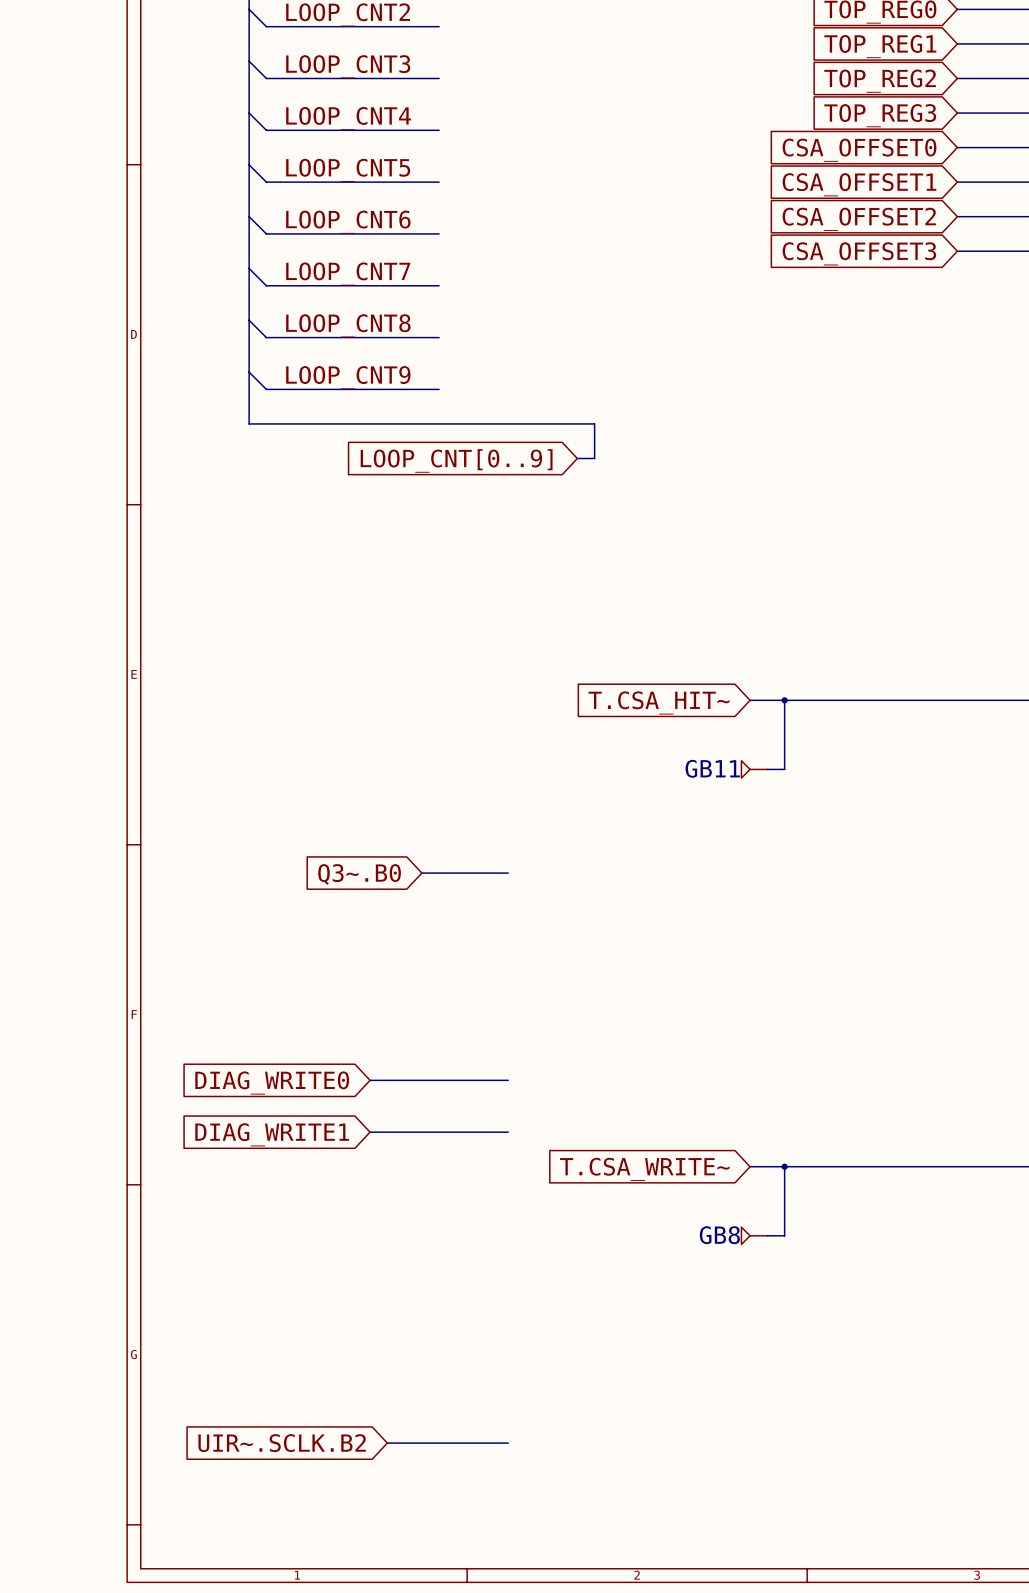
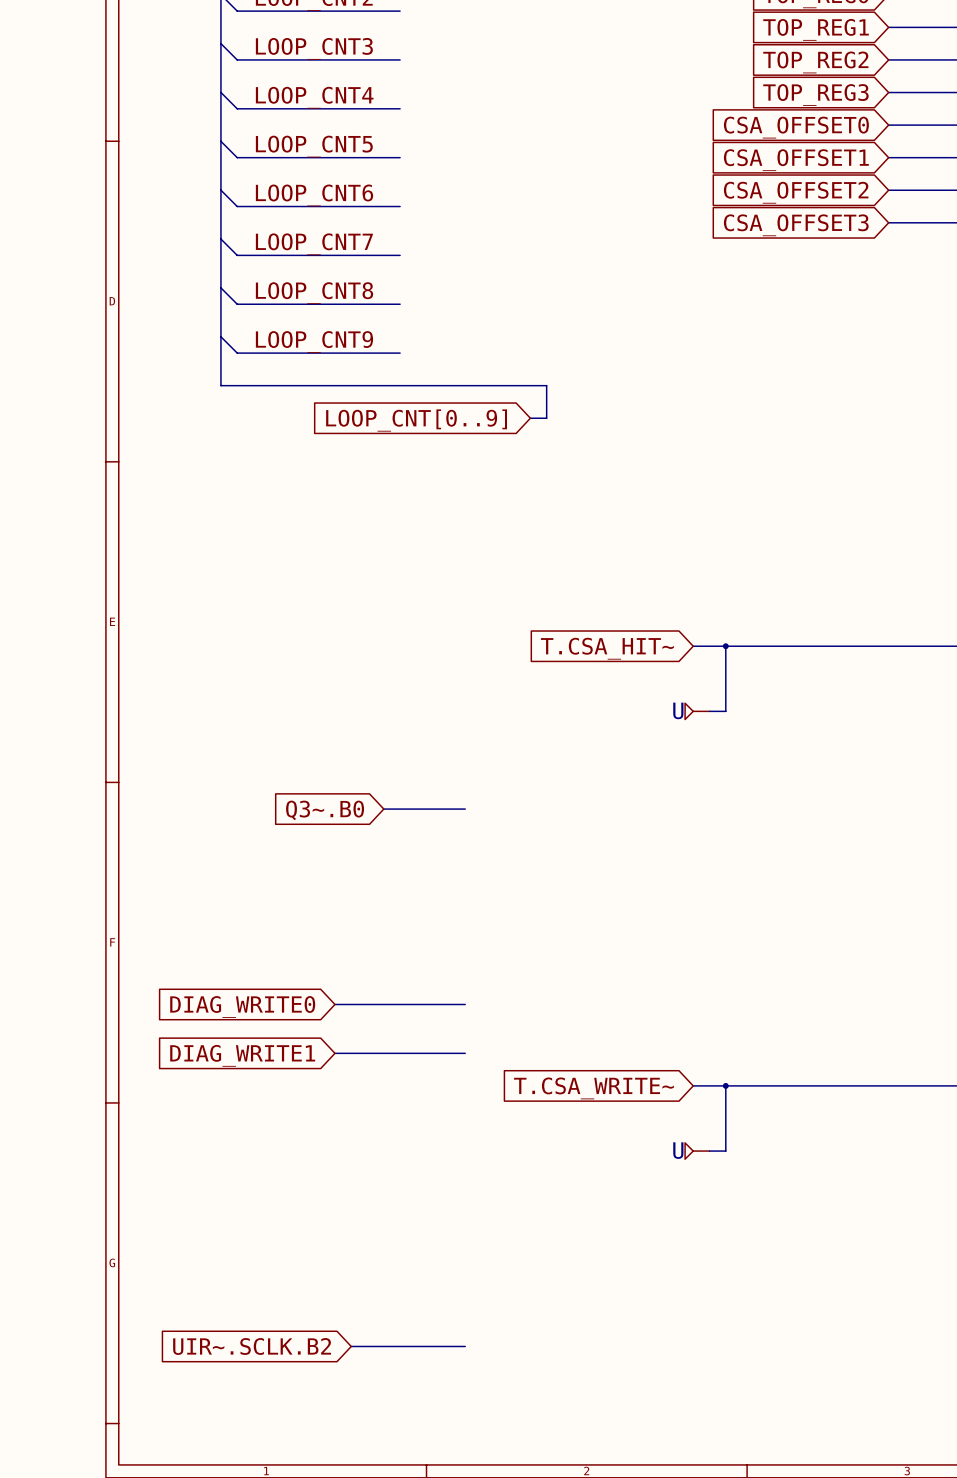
GB11 name: GB11 (712, 768) -> U (678, 710)
GB8 name: GB8 (719, 1235) -> U (678, 1150)

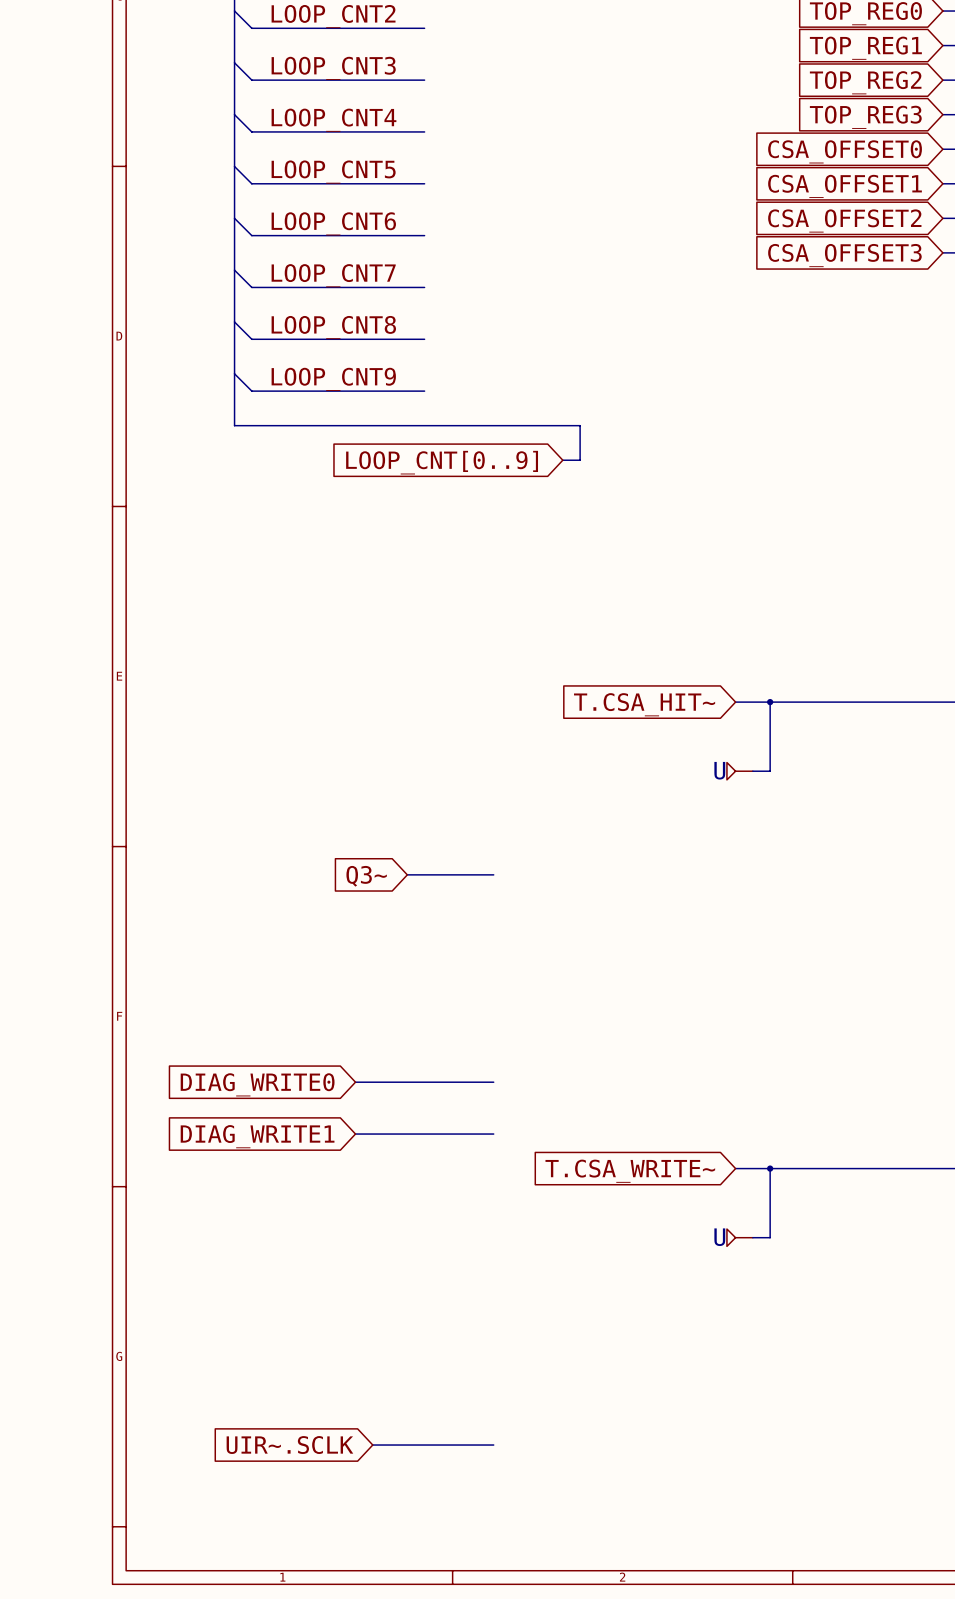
global label: Q3~.B0 (325, 810) -> Q3~ (366, 876)
global label: UIR~.SCLK.B2 (252, 1346) -> UIR~.SCLK (289, 1445)

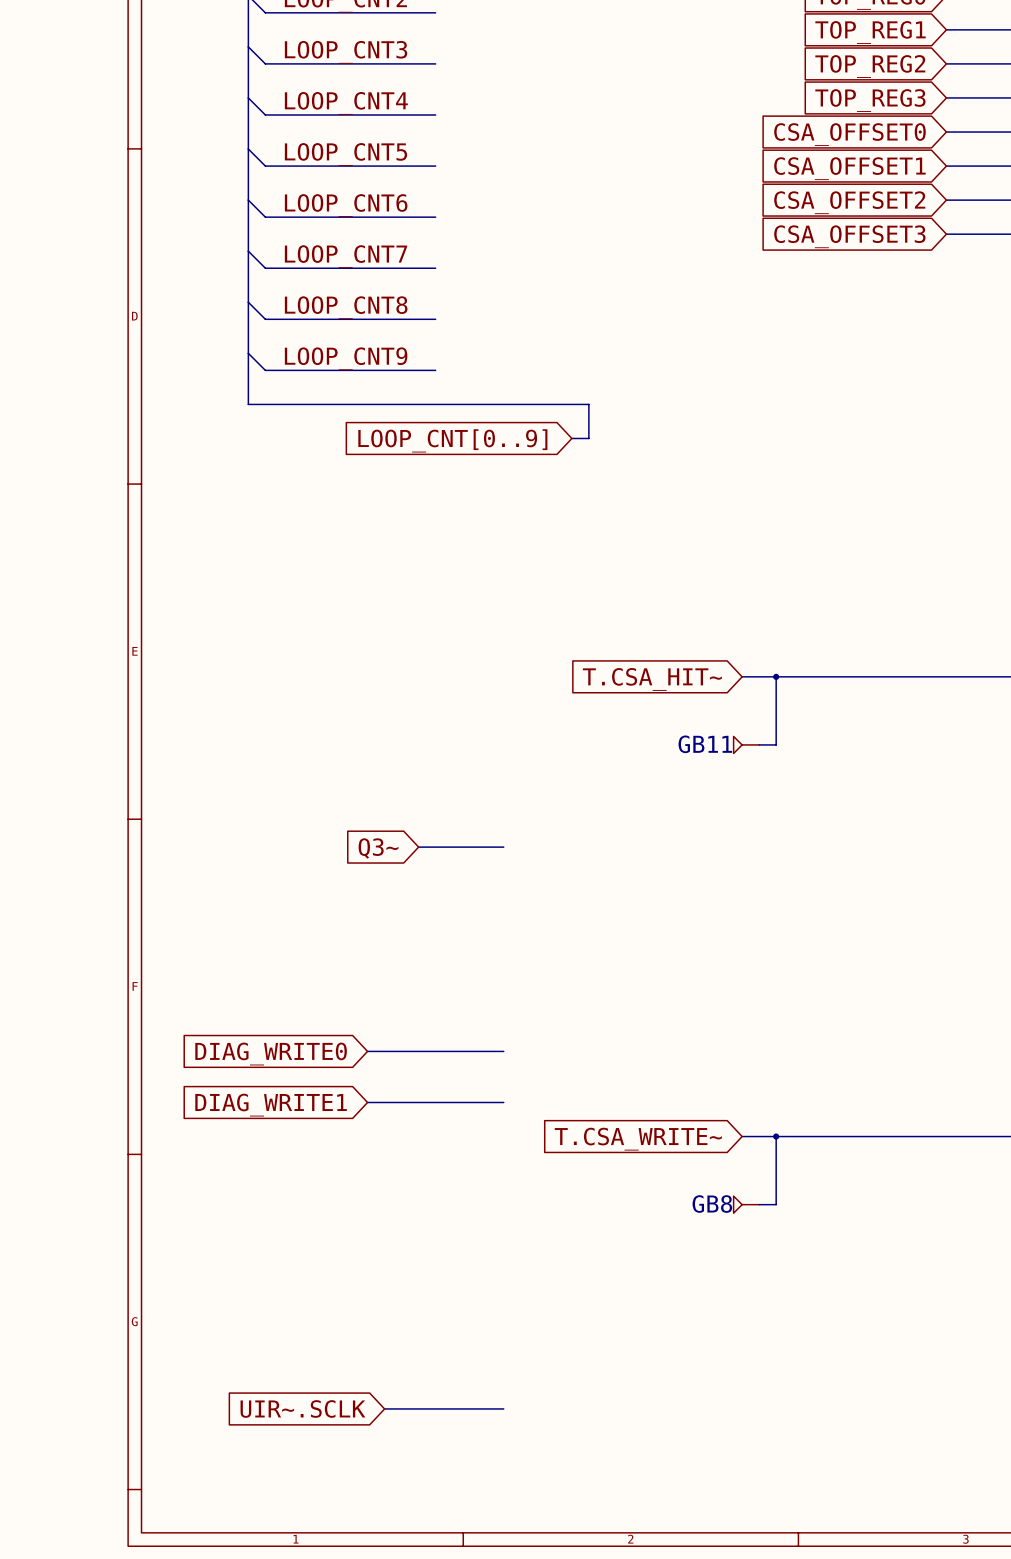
U name: U (719, 770) -> GB11 (705, 744)
U name: U (719, 1237) -> GB8 (712, 1204)

